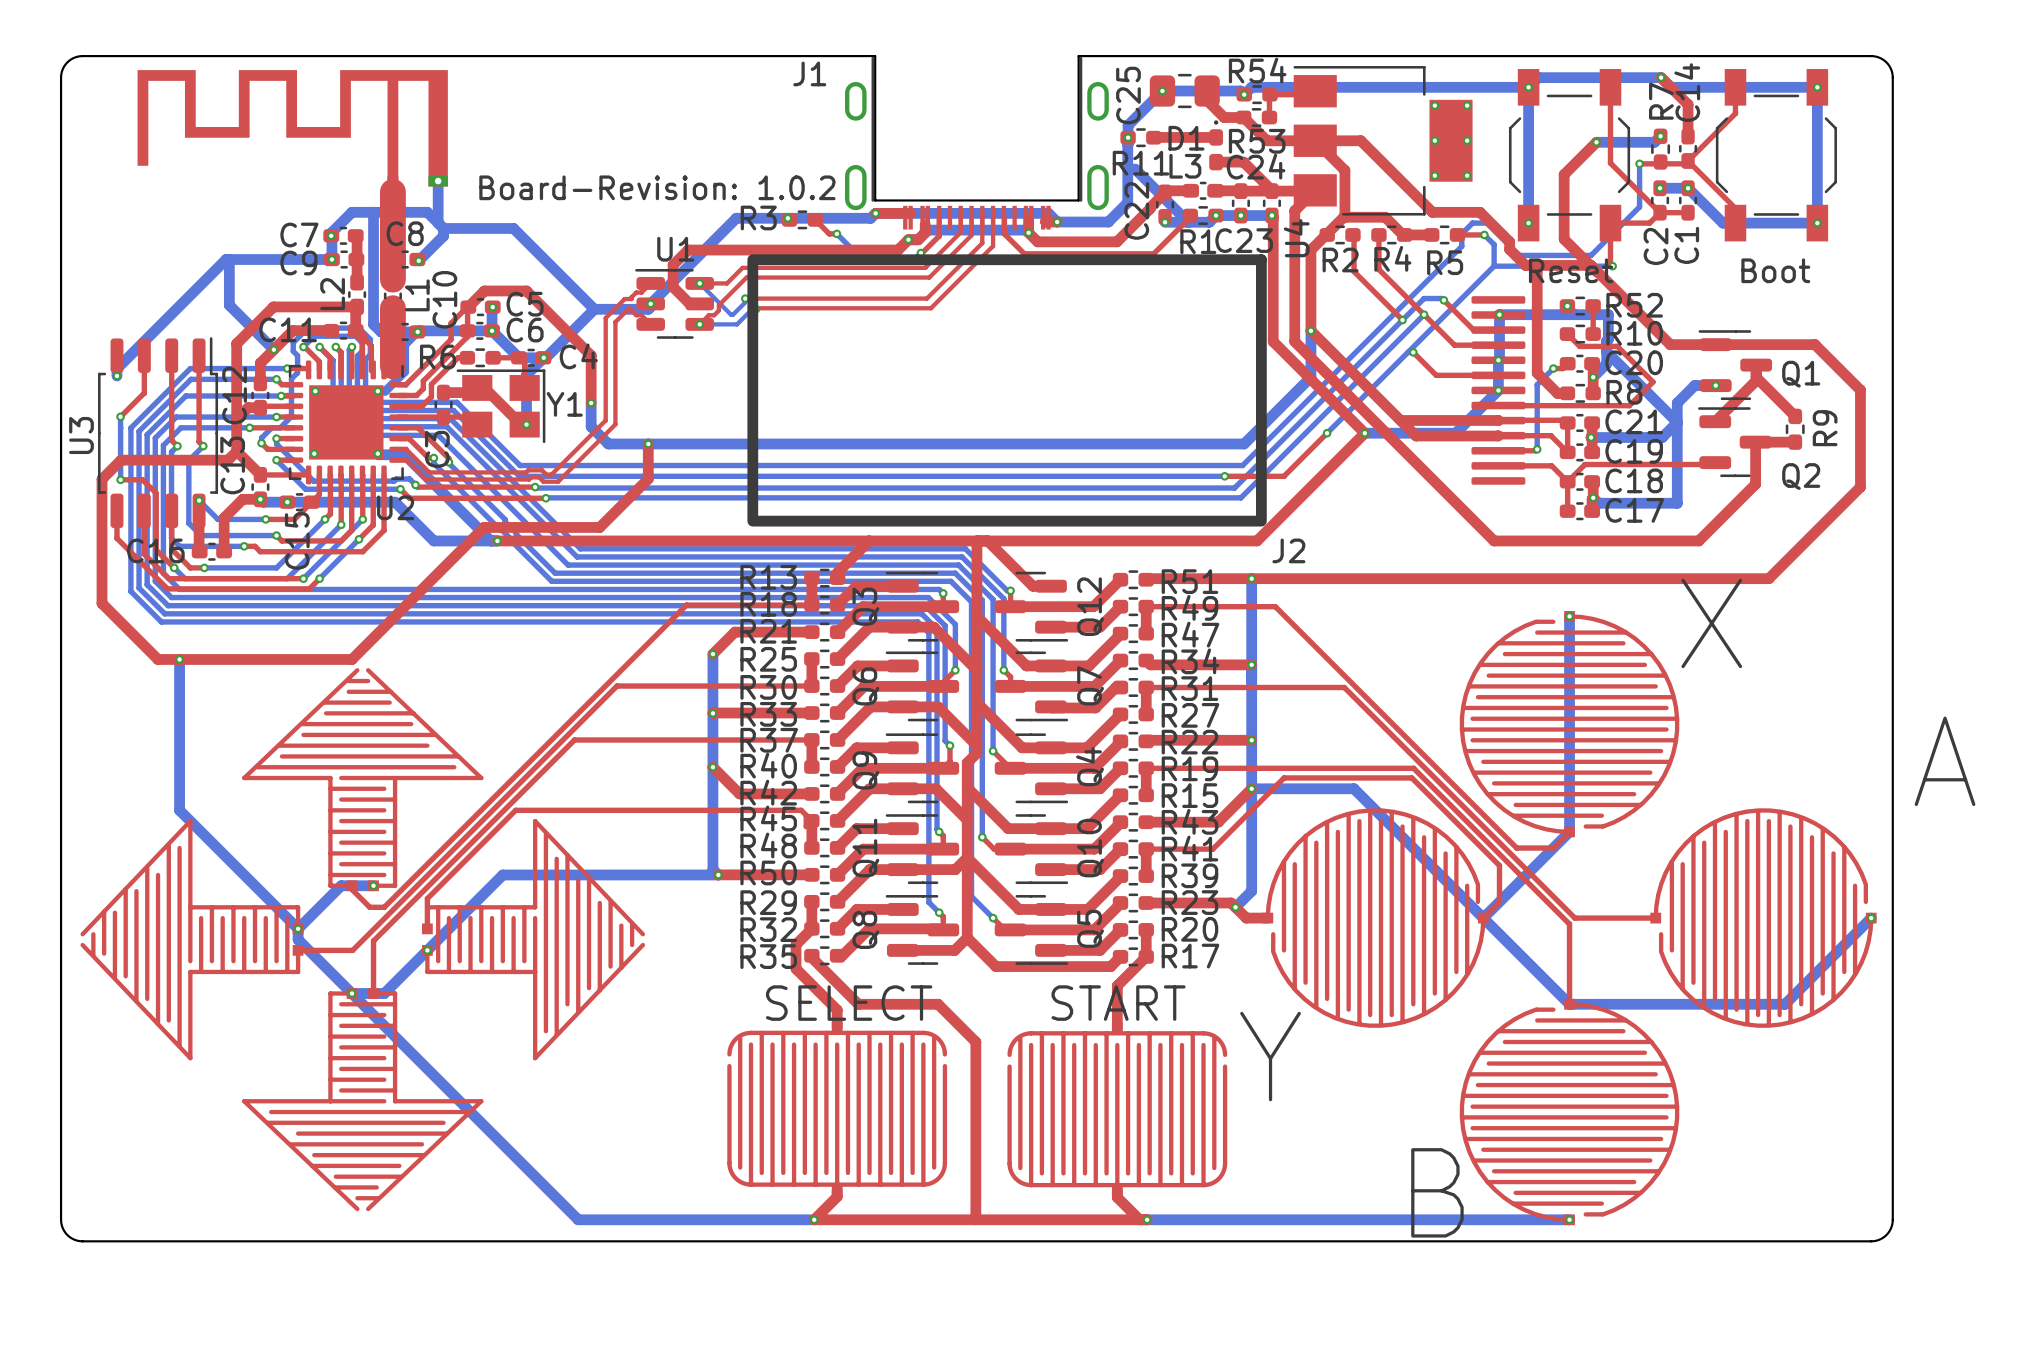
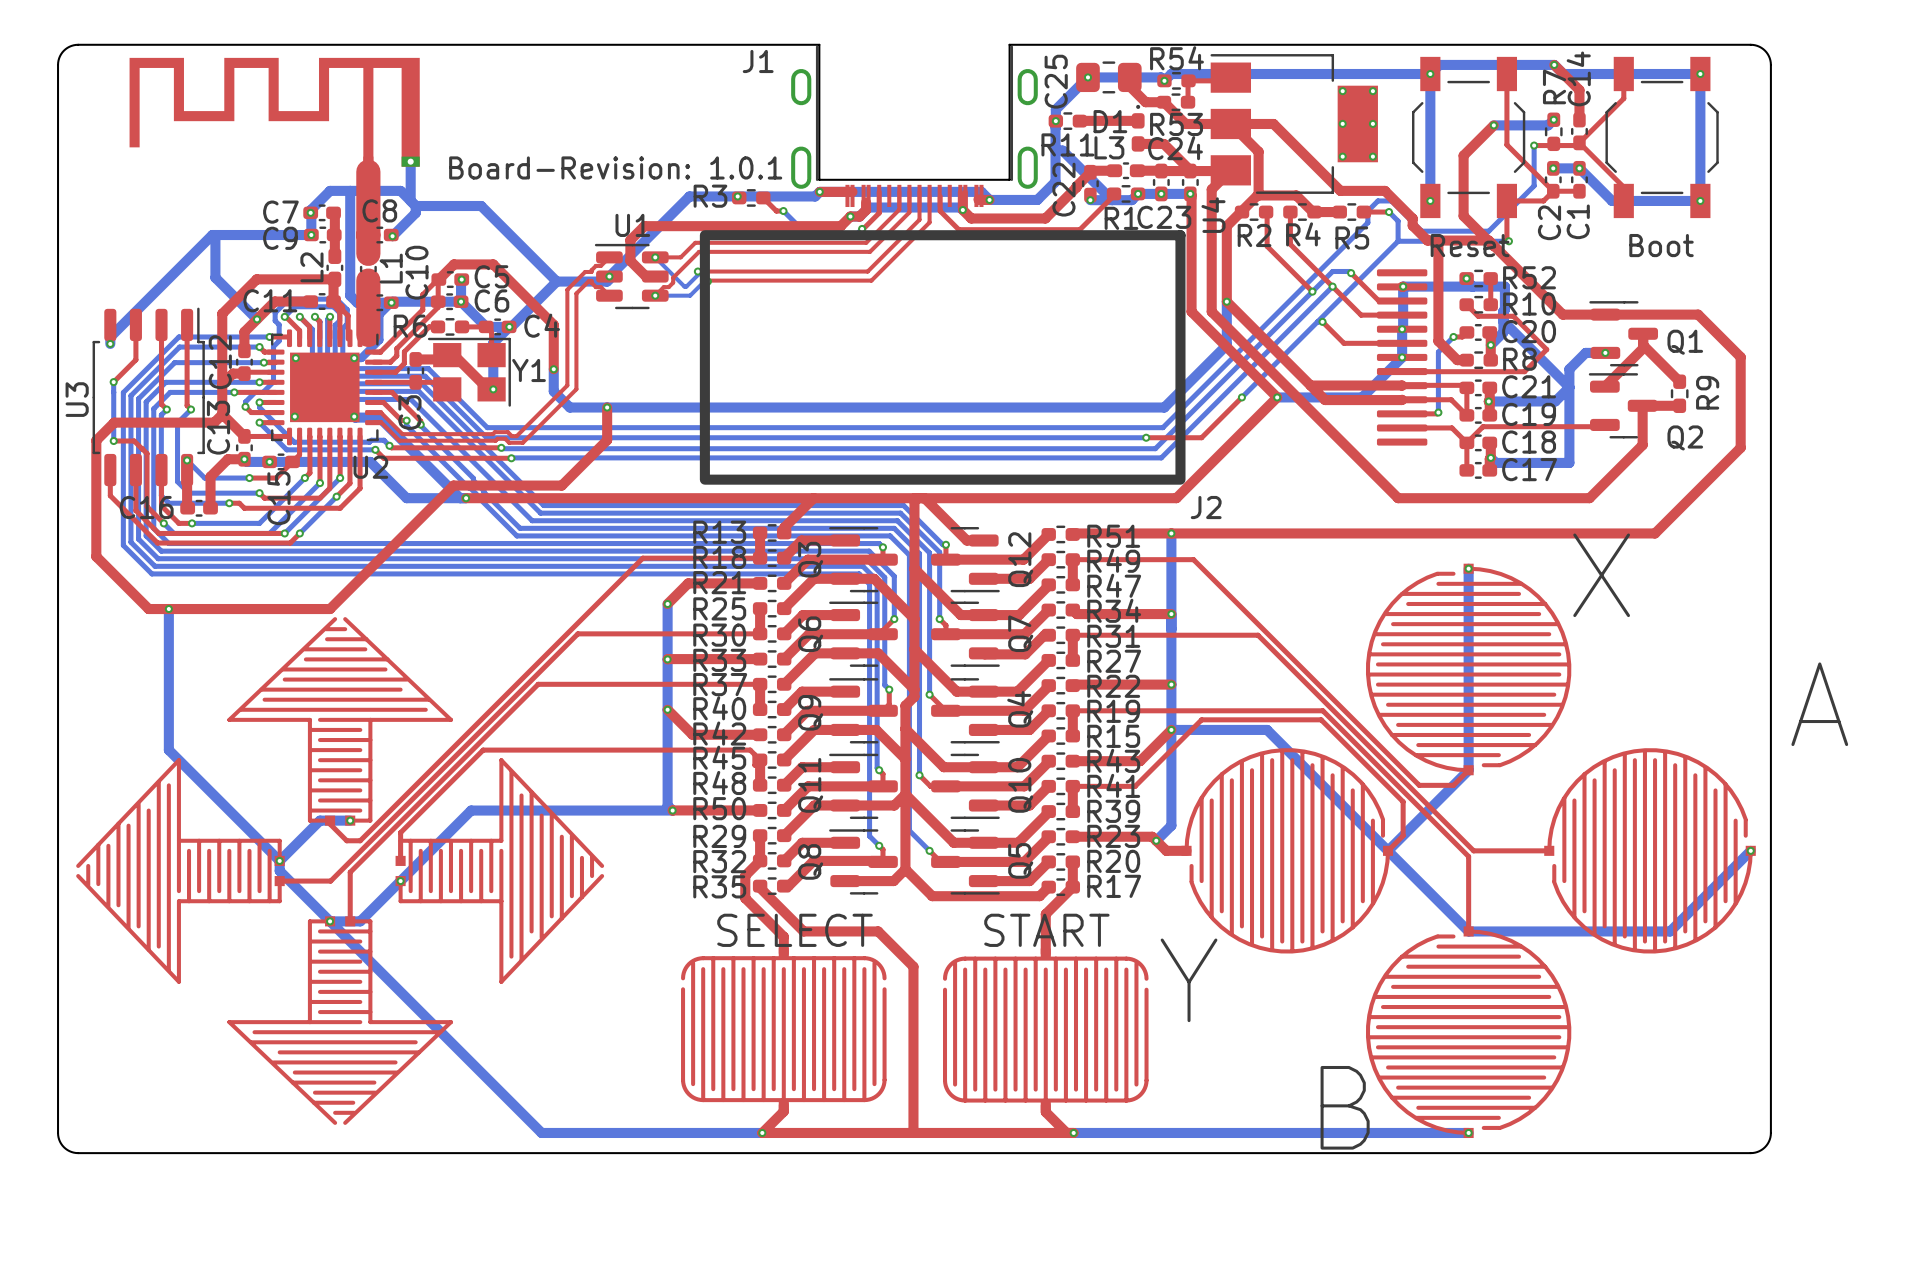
text: Board-Revision: 1.0.2 (657, 187) -> Board-Revision: 1.0.1 (615, 167)

